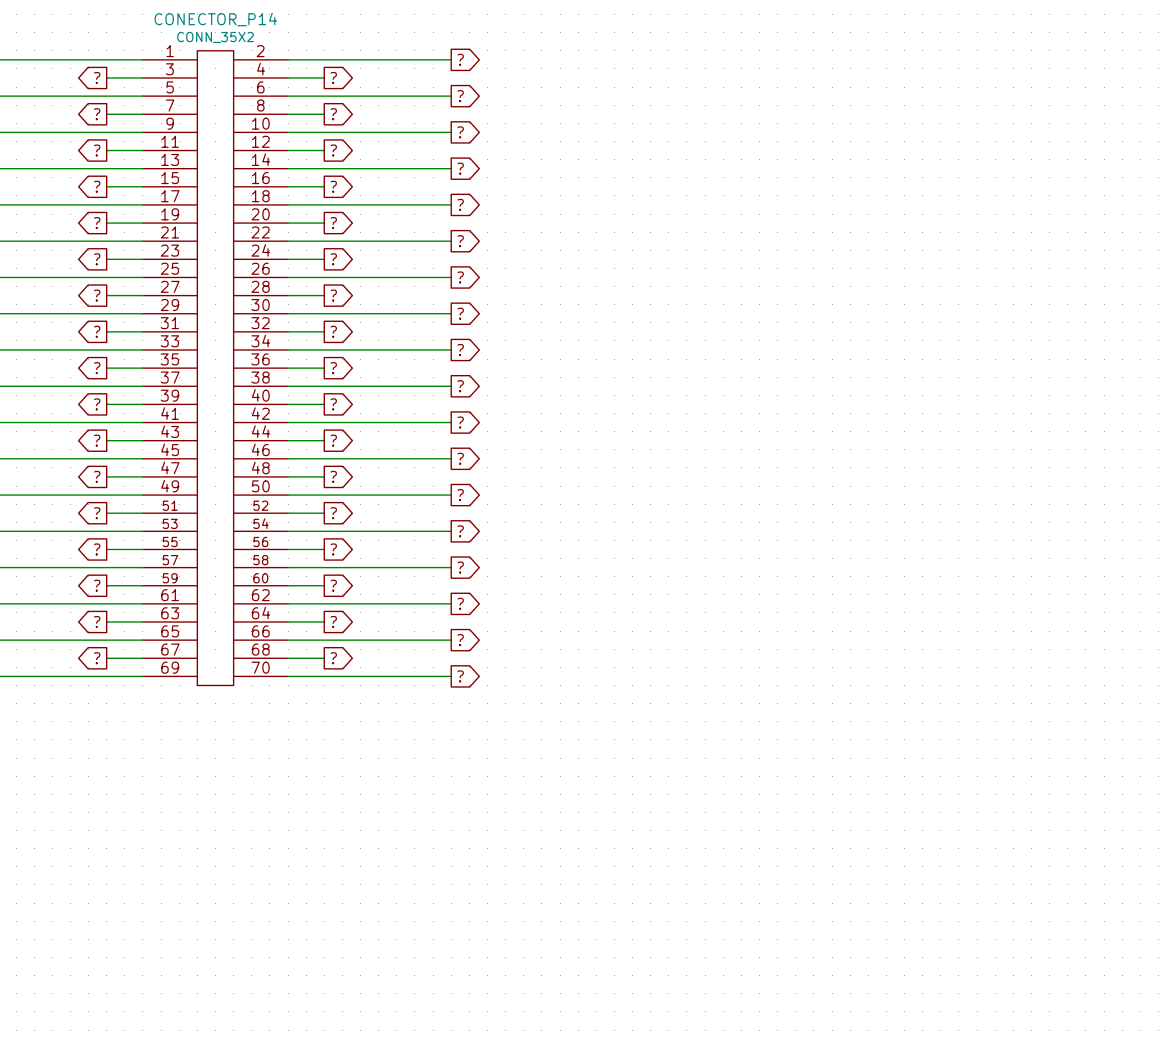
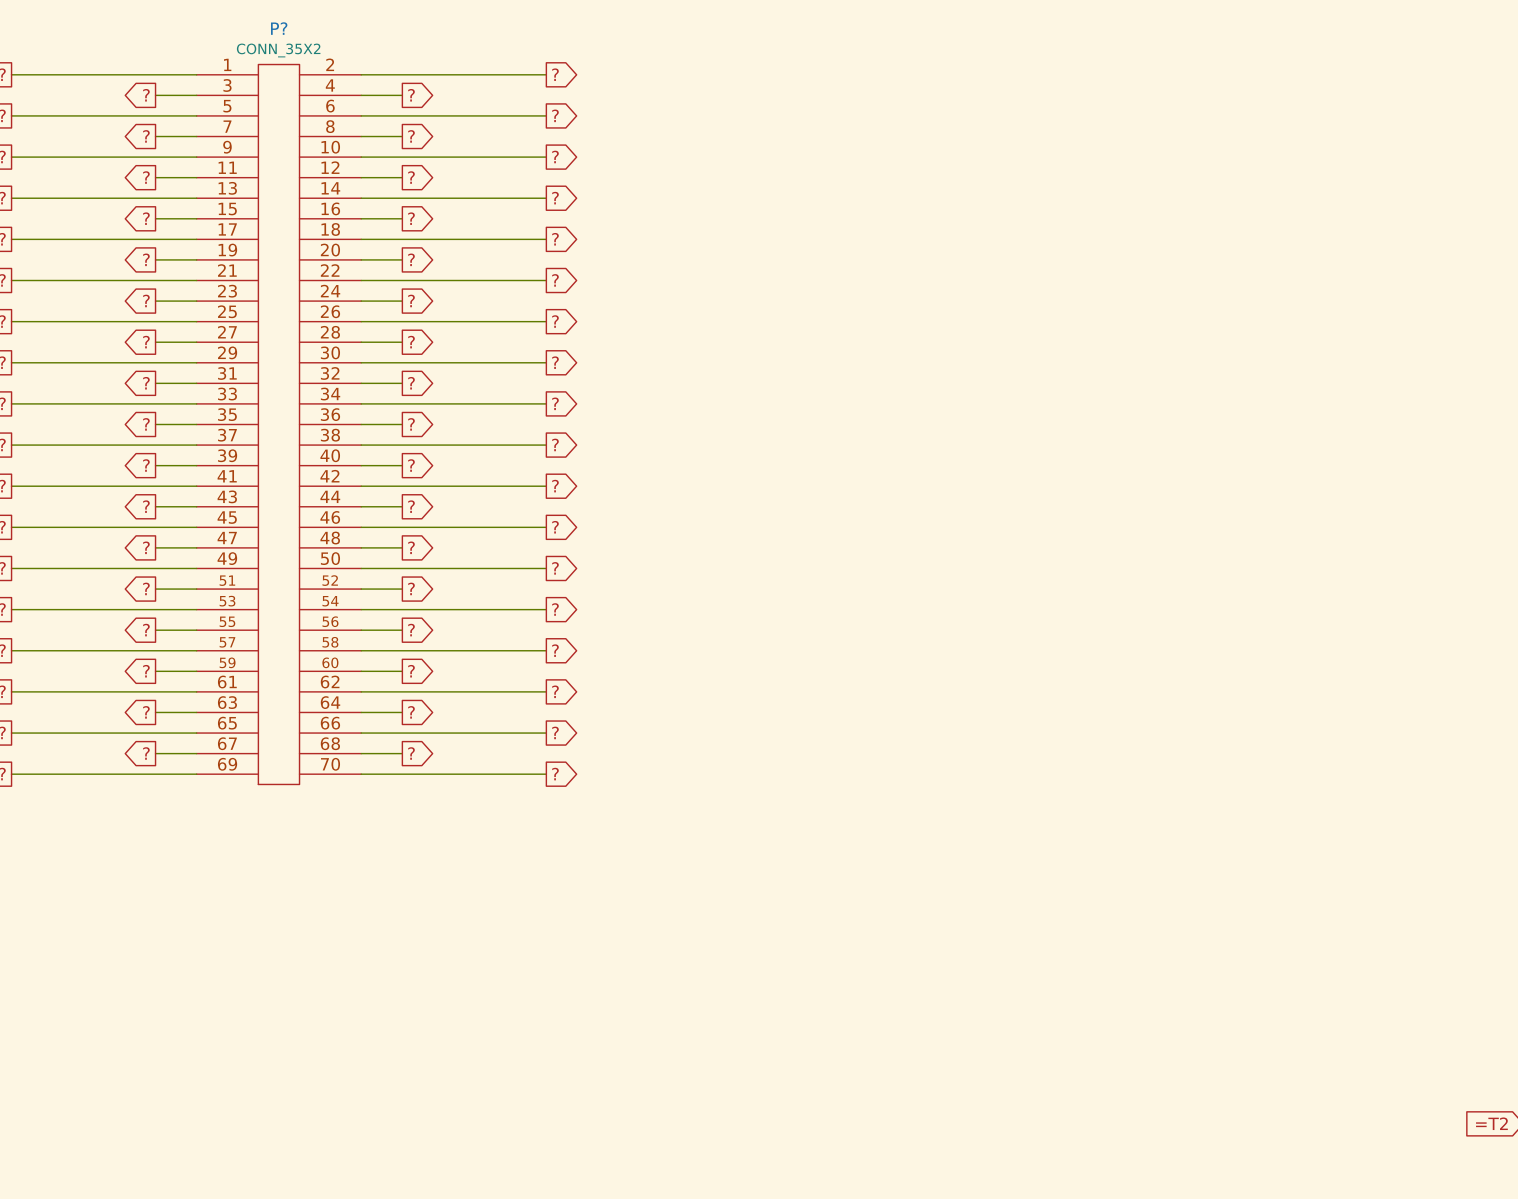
CONECTOR_P14 name: CONECTOR_P14 (215, 19) -> P? (279, 28)

